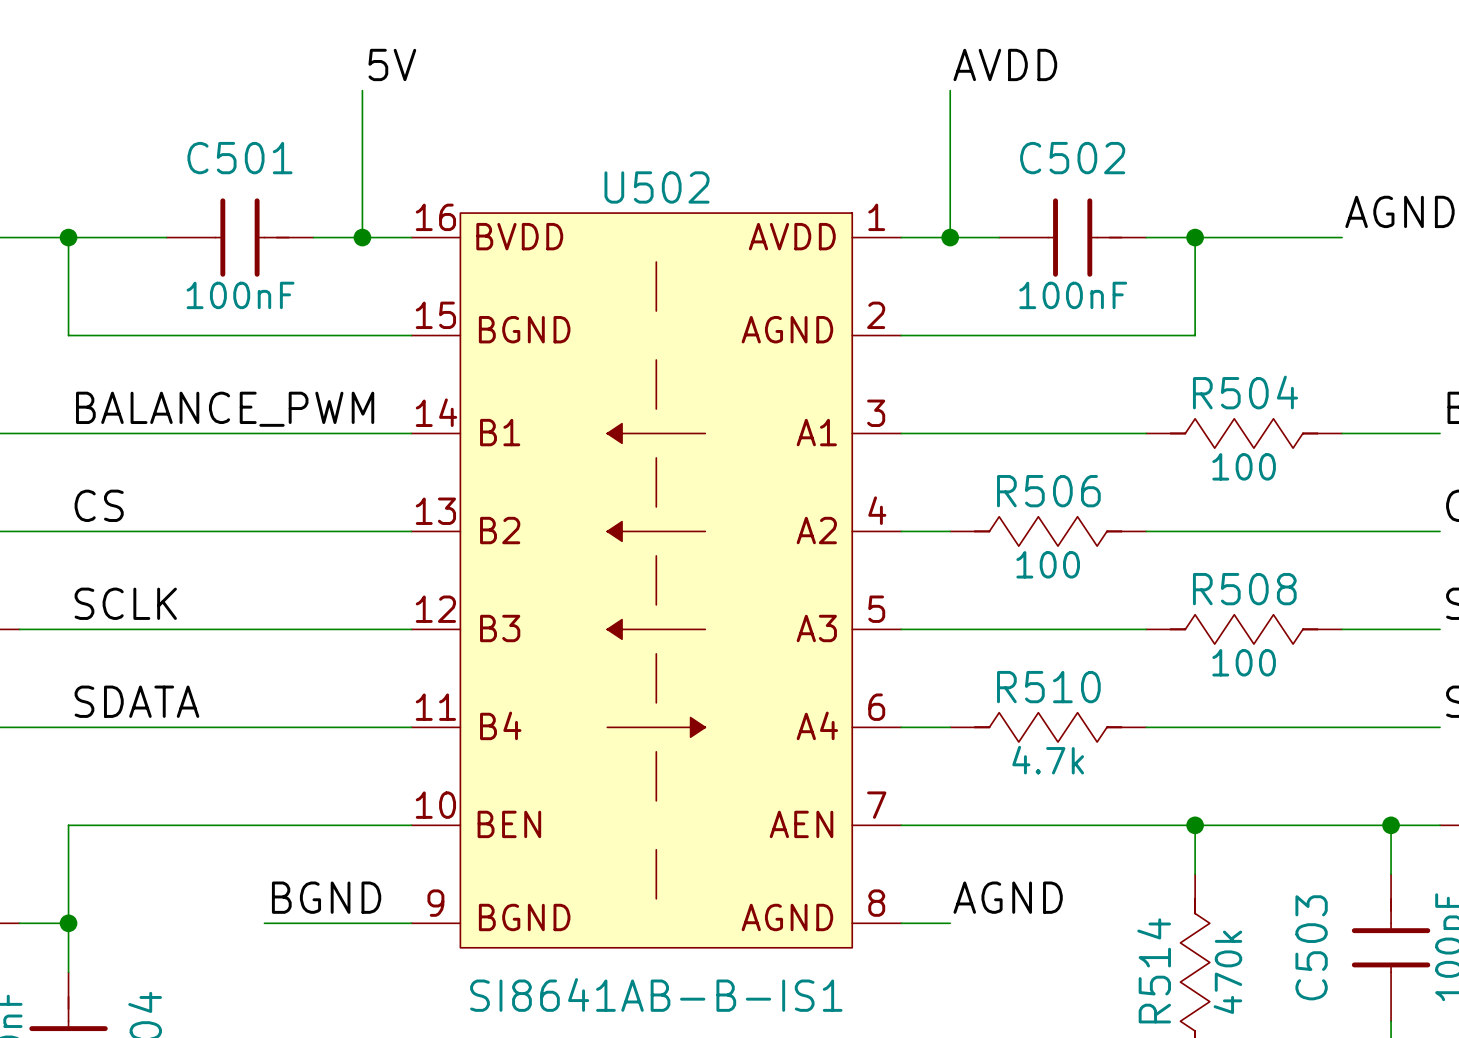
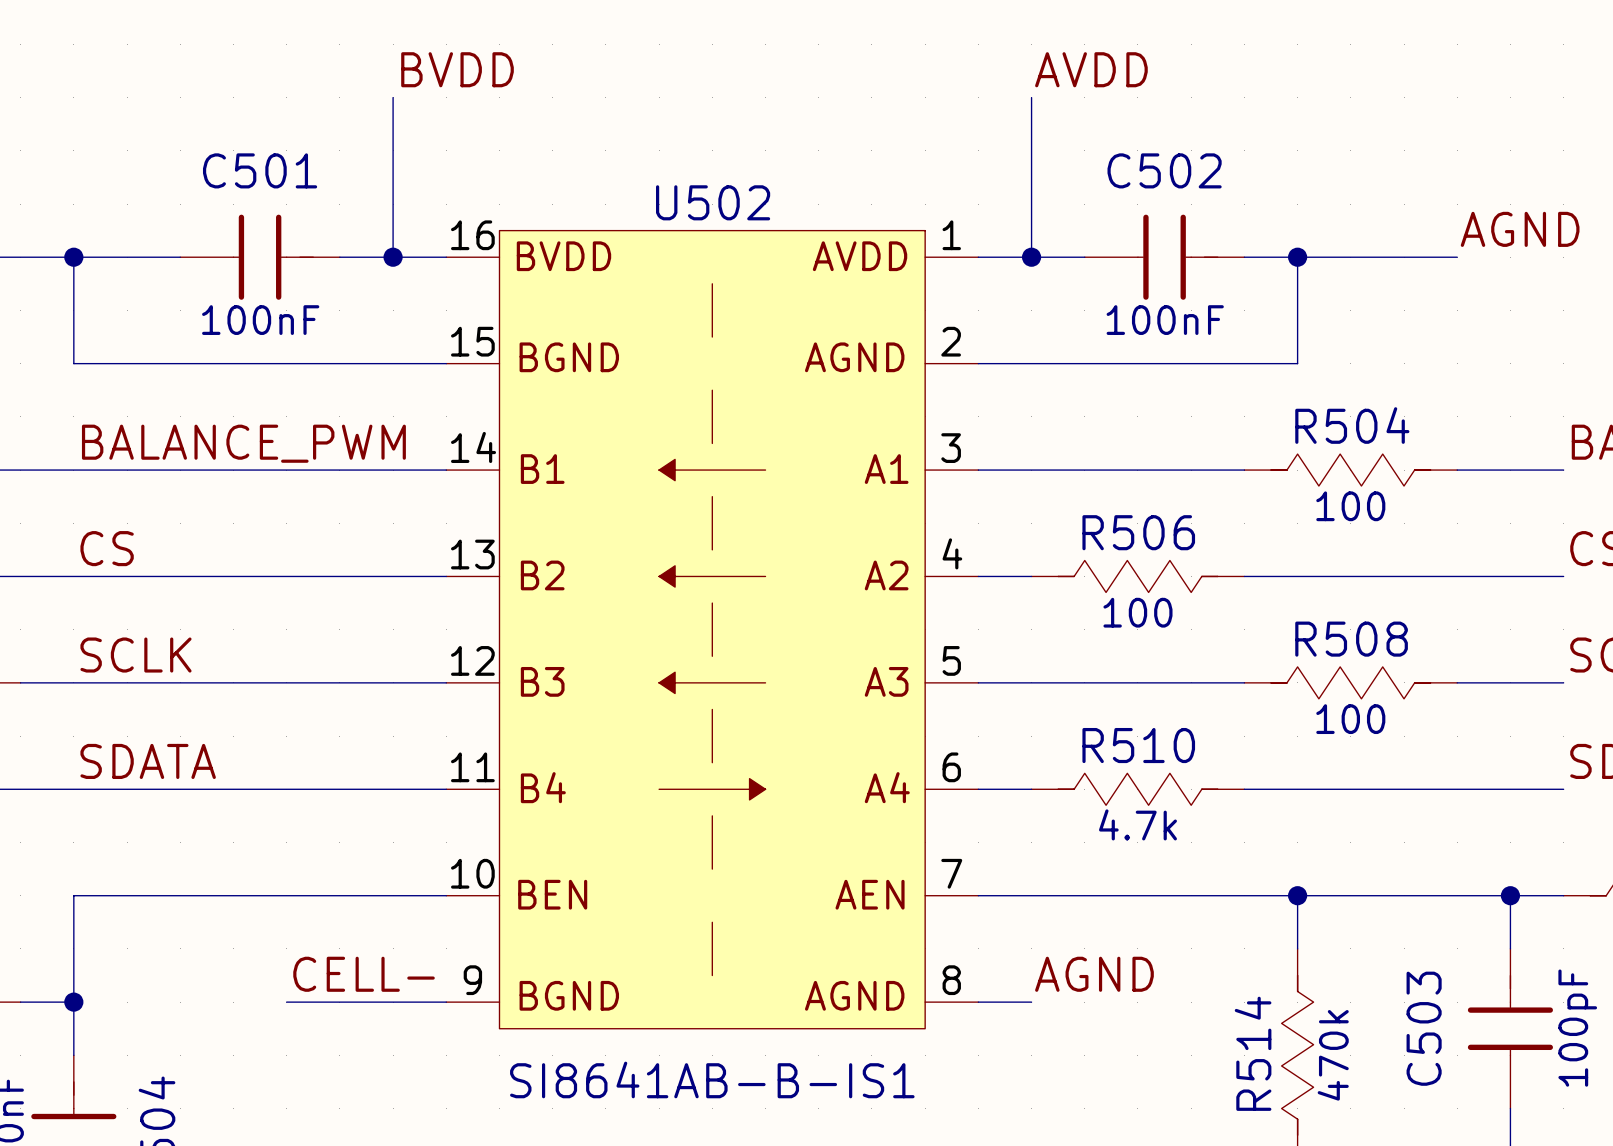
label: 5V (392, 64) -> BVDD (457, 69)
label: BGND (326, 897) -> CELL- (364, 974)

